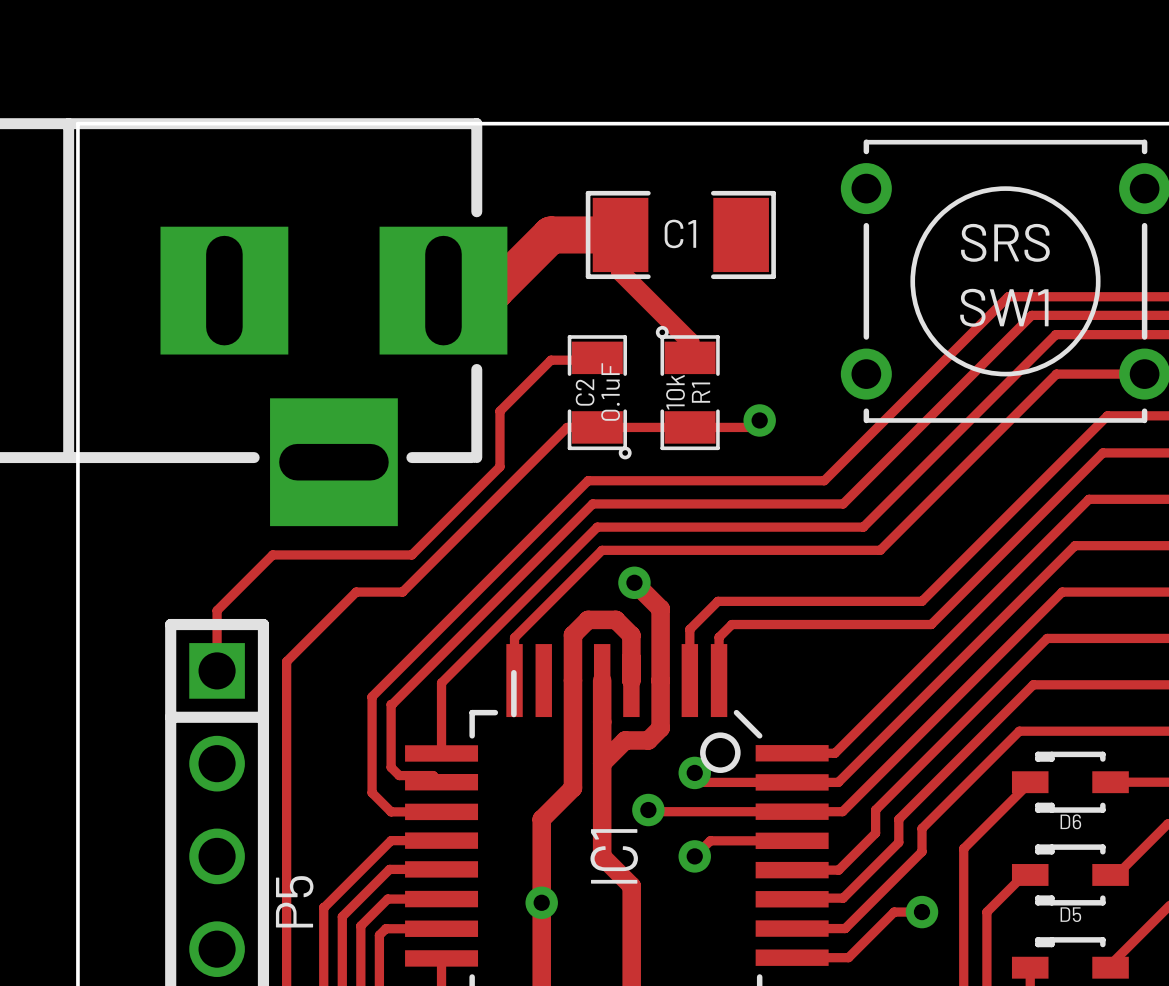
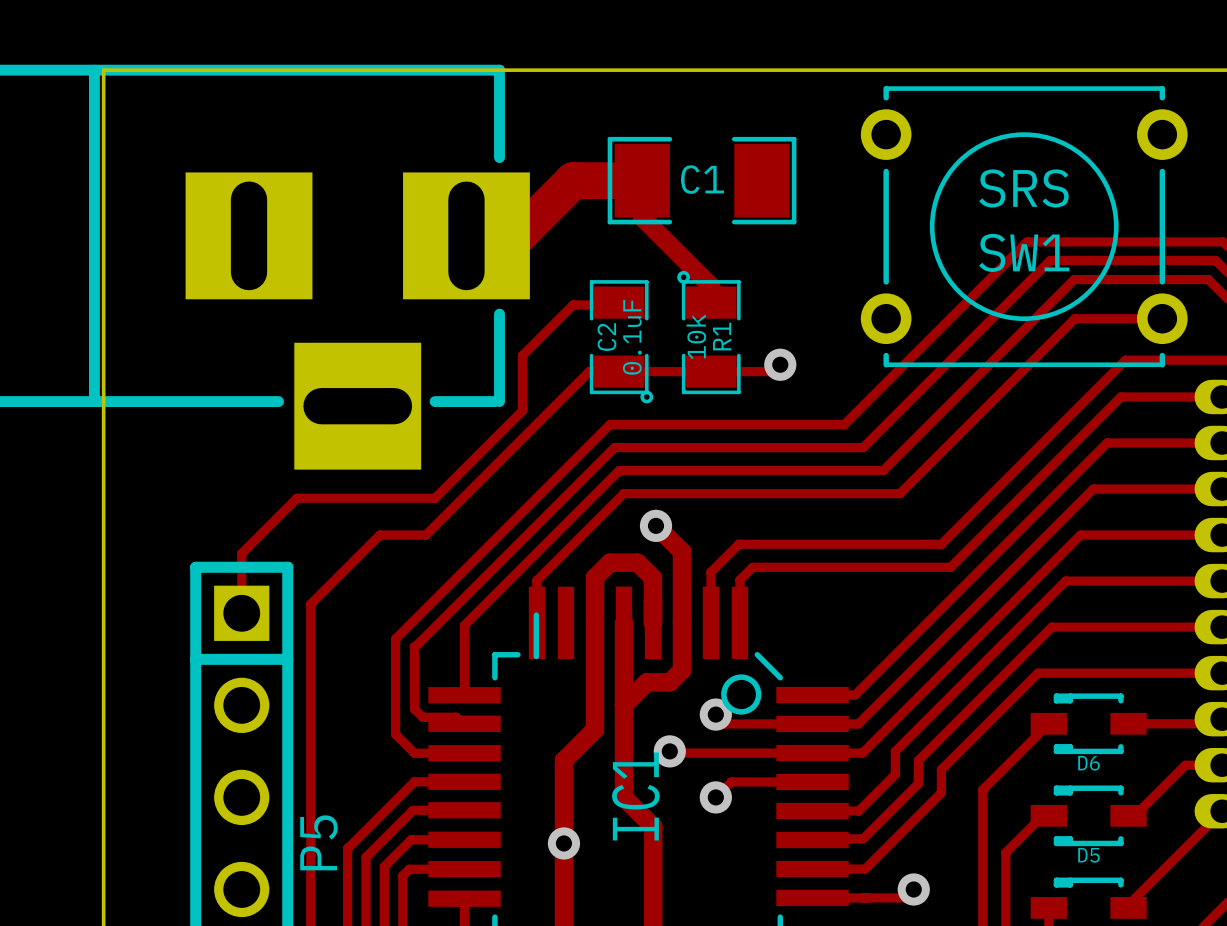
track: (921, 912) (894, 912) (848, 957) -> (913, 889) (905, 897) (868, 897)
via: (921, 912) -> none
via: none -> (913, 889)

